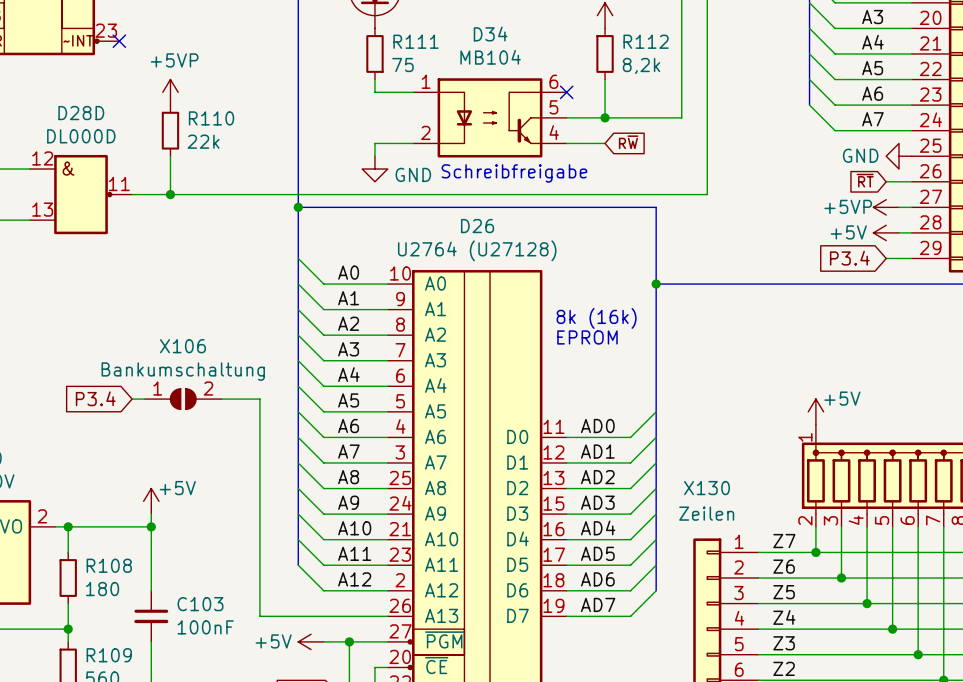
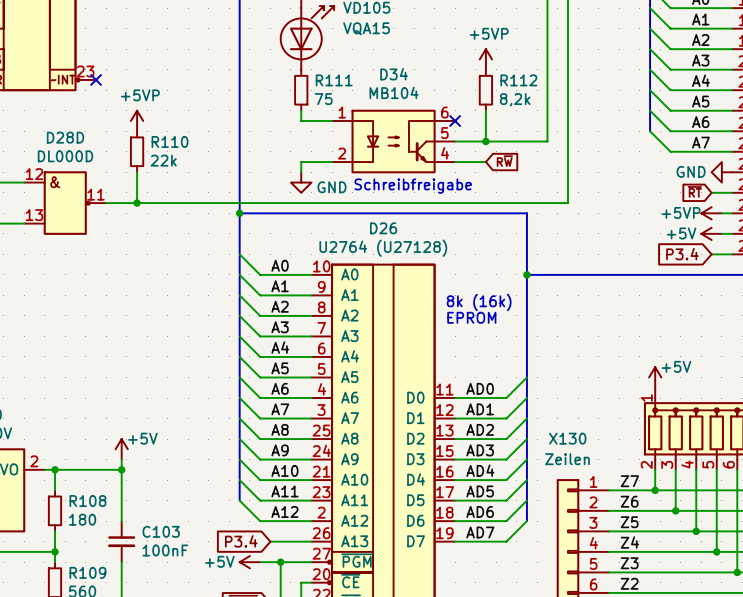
global label: P3.4 (95, 398) -> none
wire: (132, 399) (144, 399) -> none
X106: Bankumschaltung (183, 399) -> none
wire: (221, 399) (259, 399) (259, 616) (336, 616) -> none
global label: none -> P3.4 (241, 541)

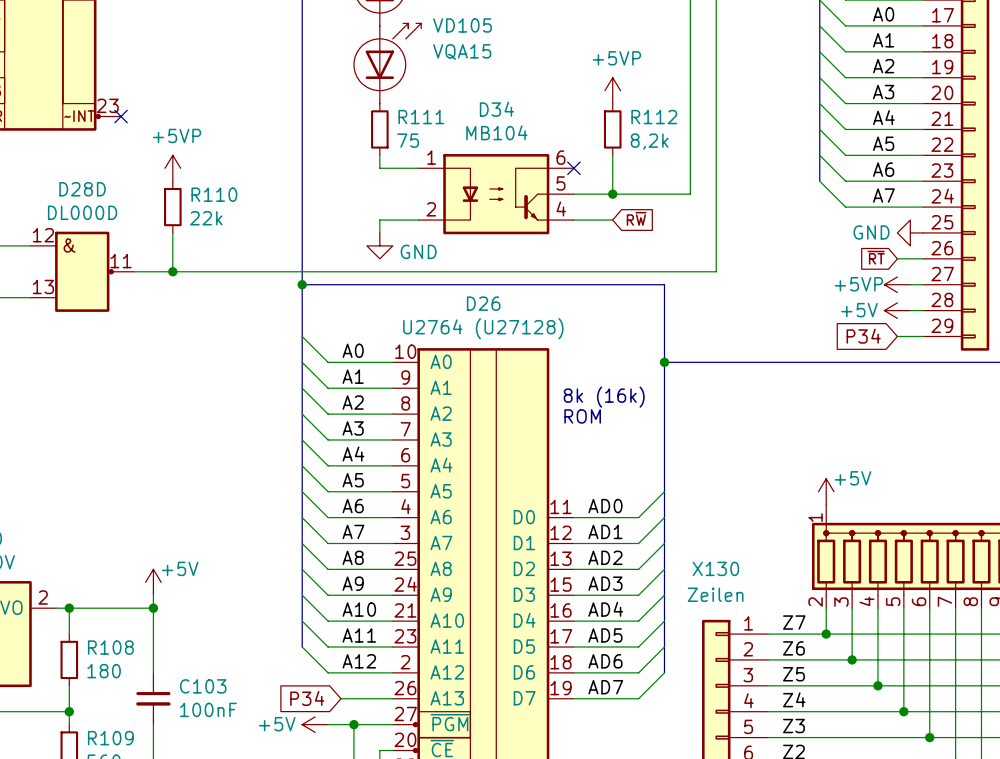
text: Schreibfreigabe (413, 186) -> none
global label: P3.4 (682, 254) -> P34 (863, 336)
text: EPROM (471, 317) -> ROM (582, 416)
global label: P3.4 (241, 541) -> P34 (307, 698)

